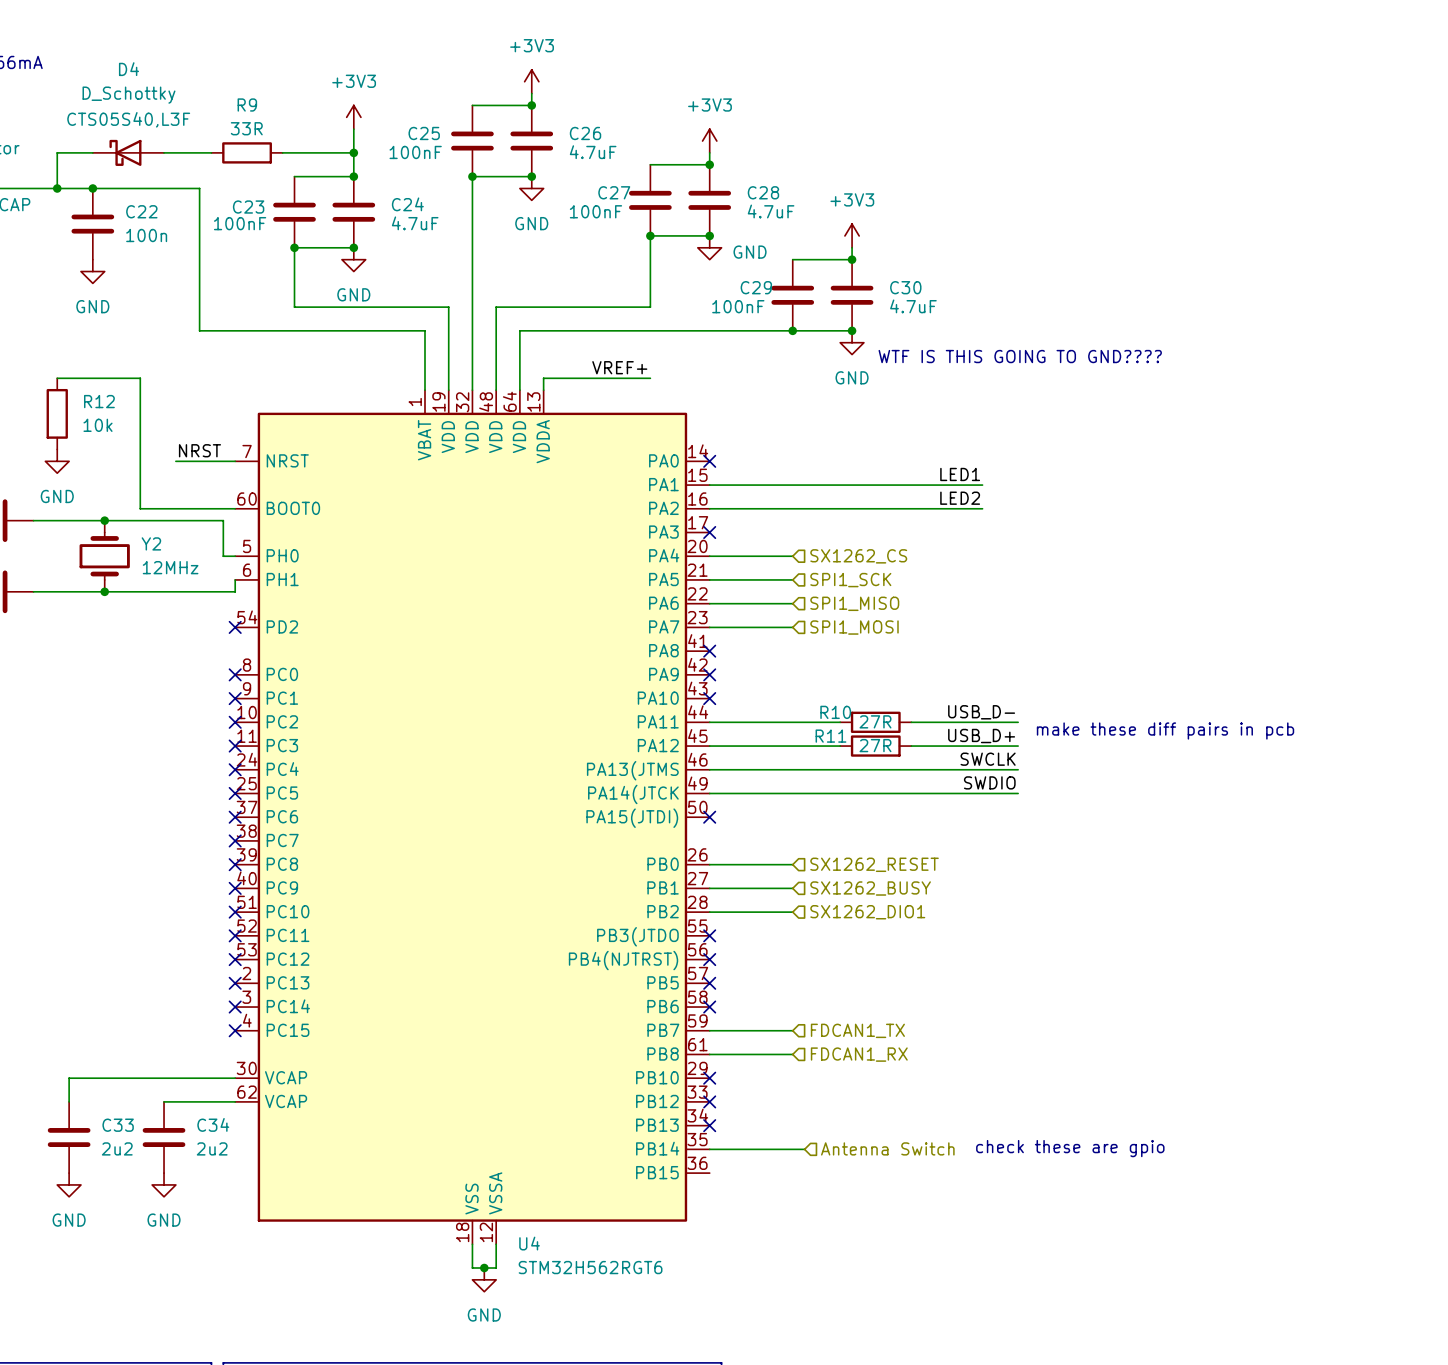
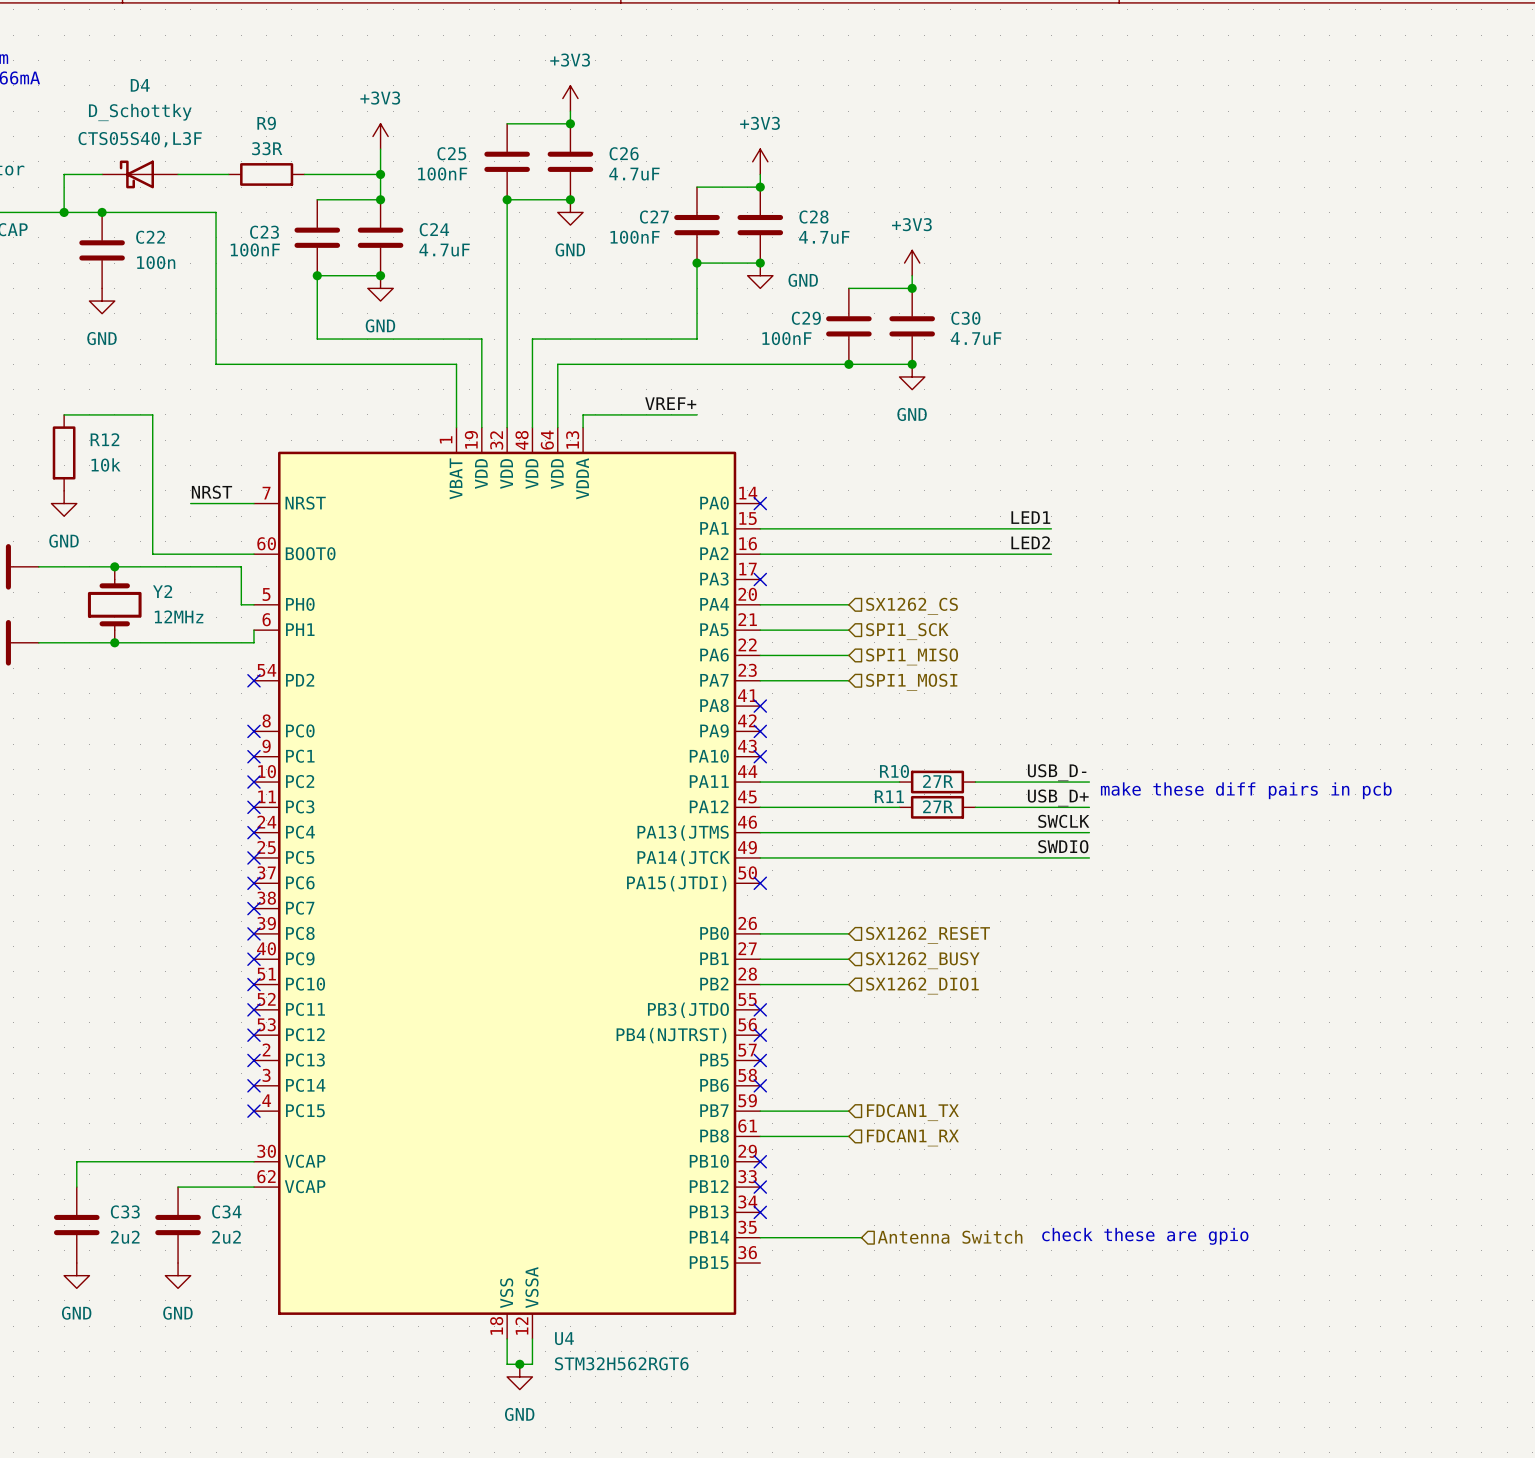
text: WTF IS THIS GOING TO GND???? (1020, 356) -> none

